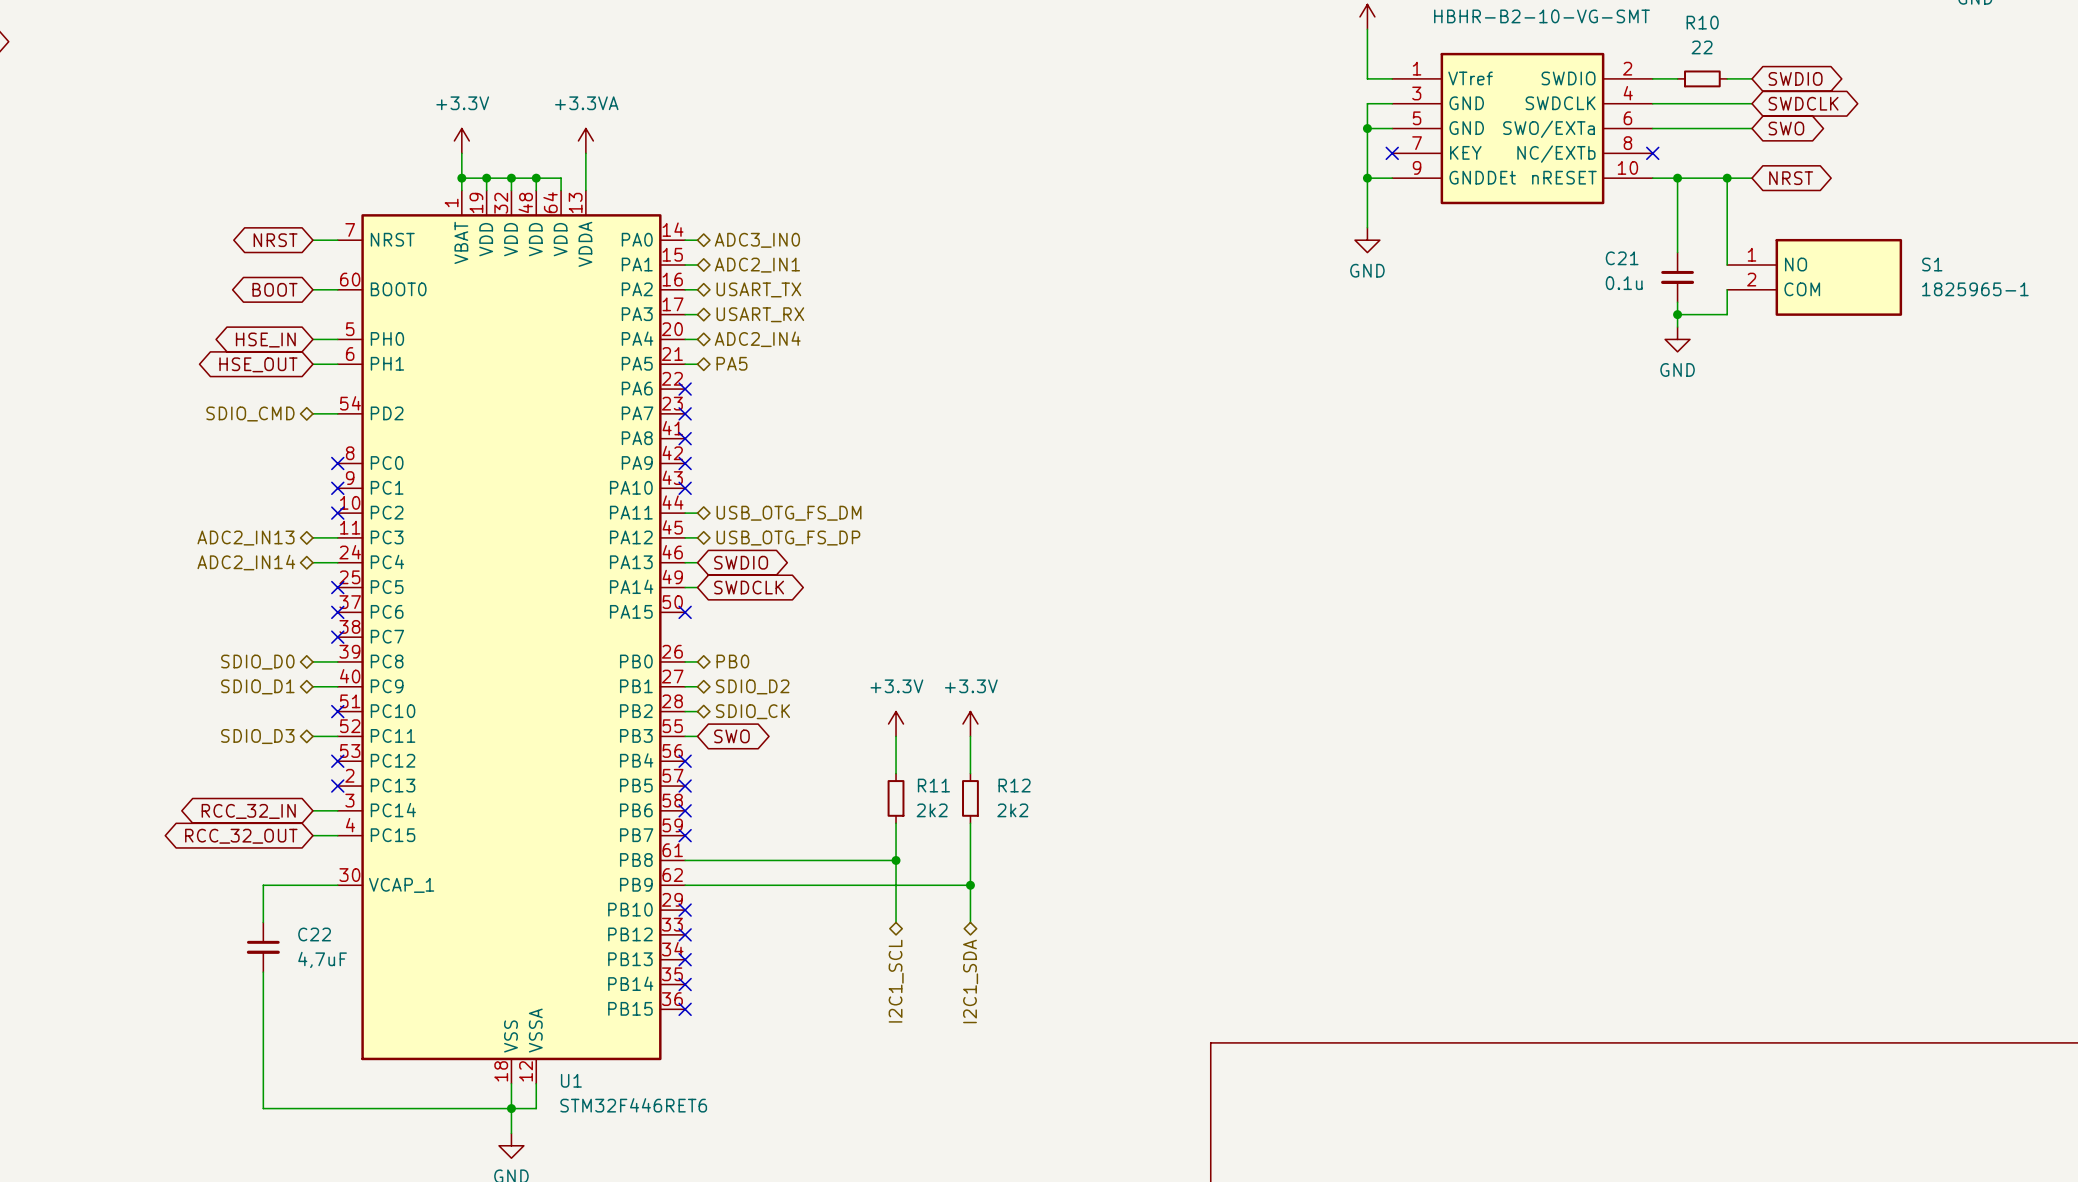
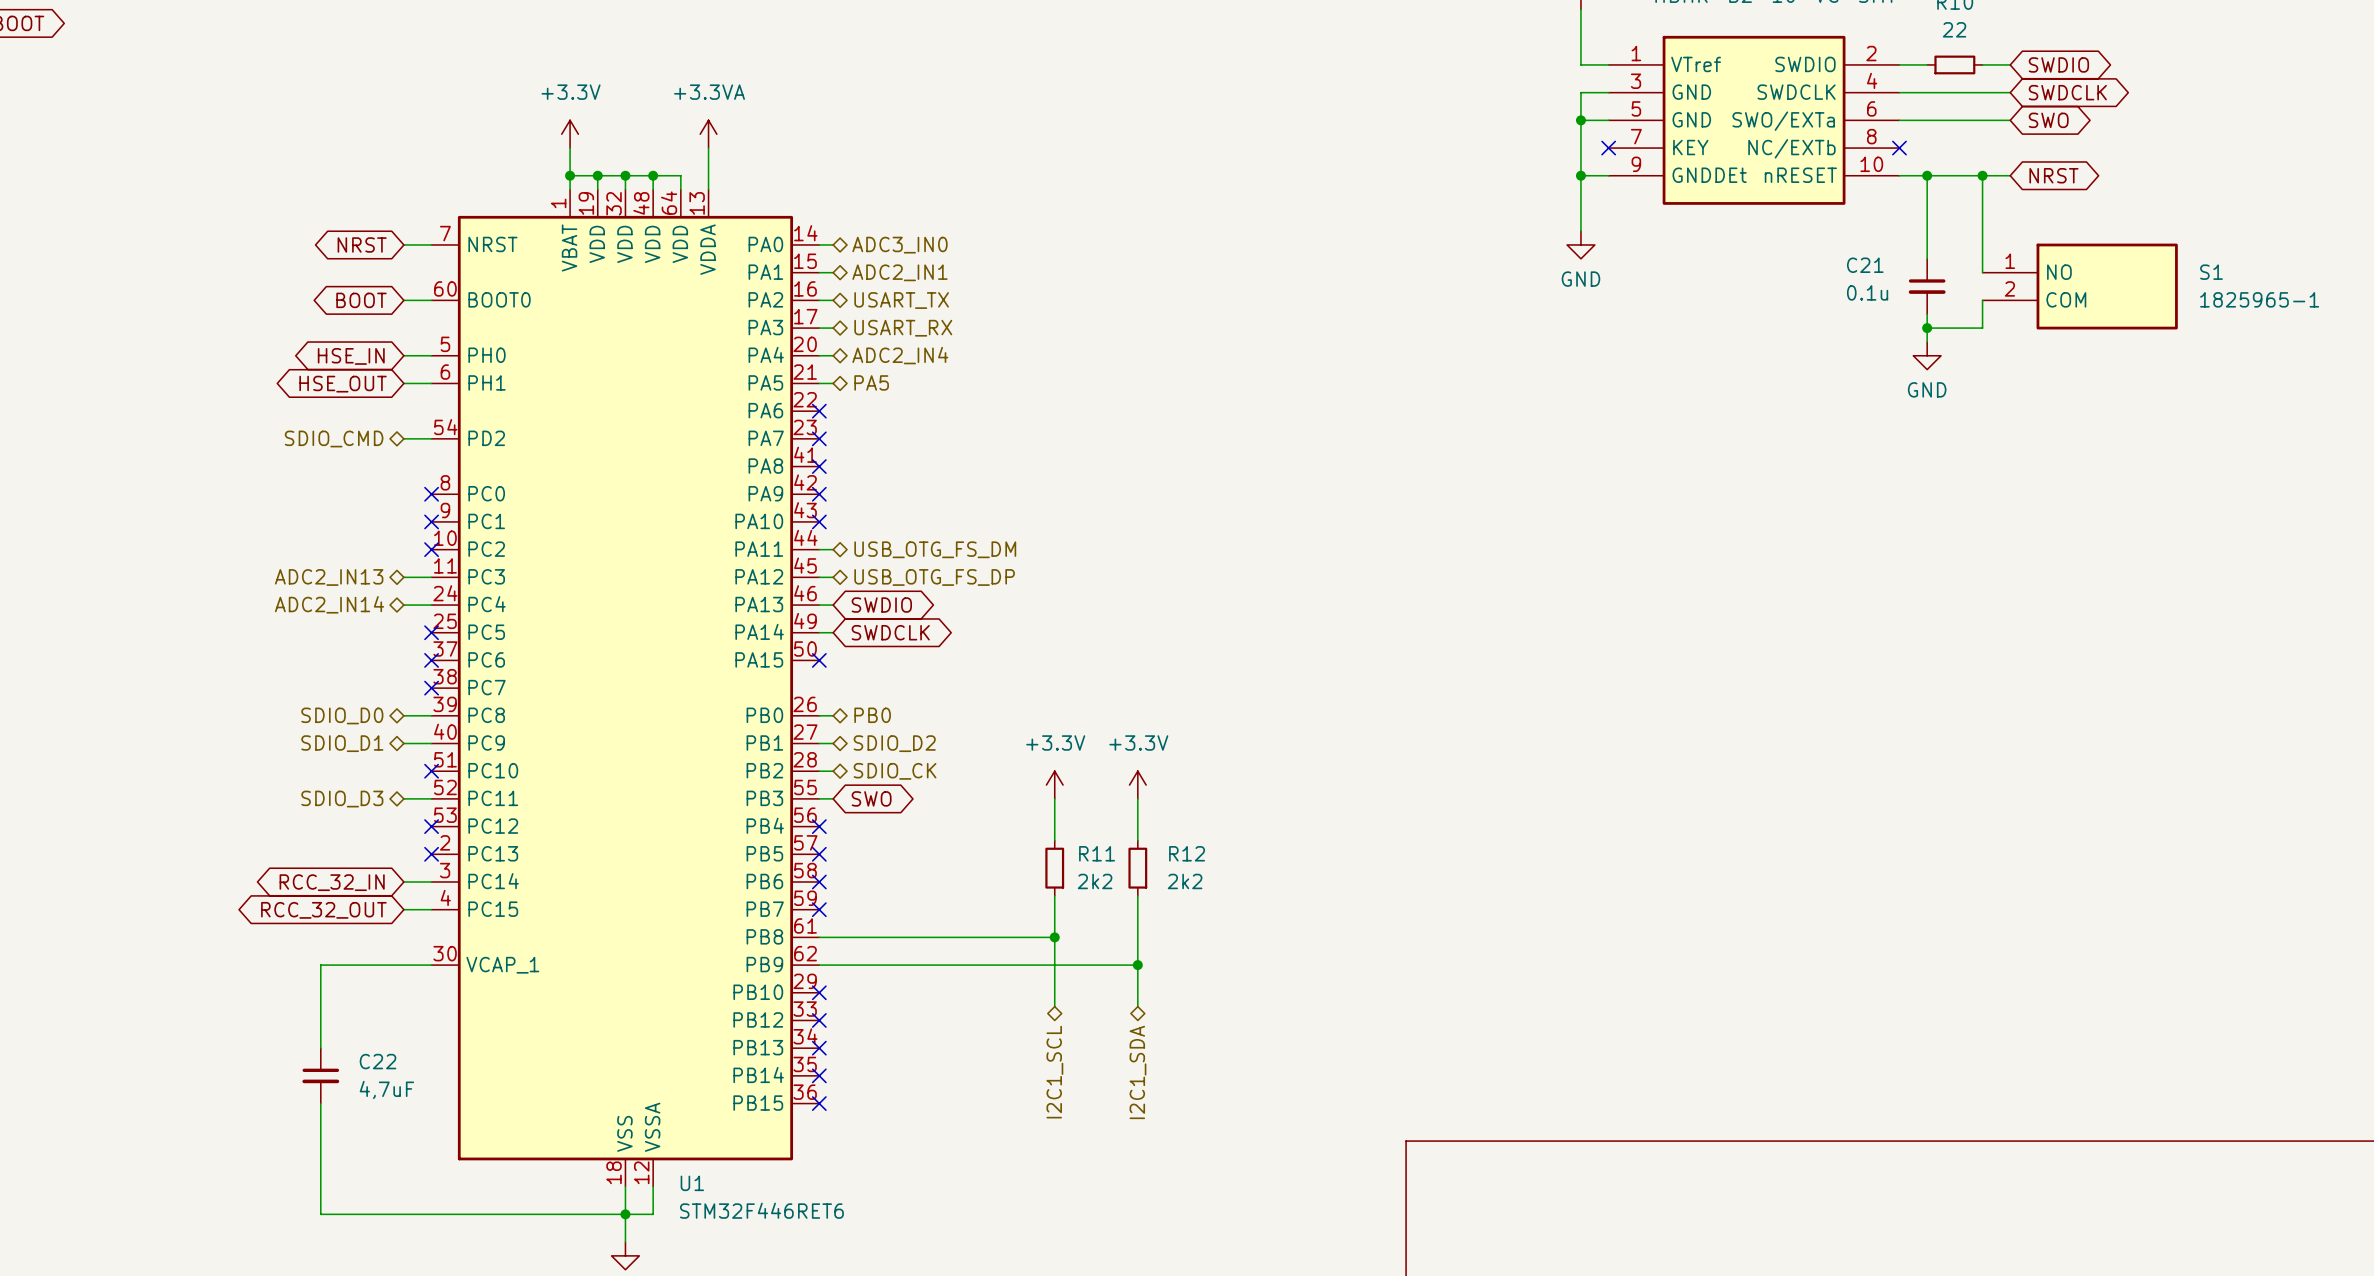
wire: (263, 885) (263, 922) -> (348, 965) (320, 965) (320, 1048)
C22 position: (263, 947) -> (320, 1075)
wire: (263, 972) (263, 1108) -> (320, 1103) (320, 1214) (348, 1214)

